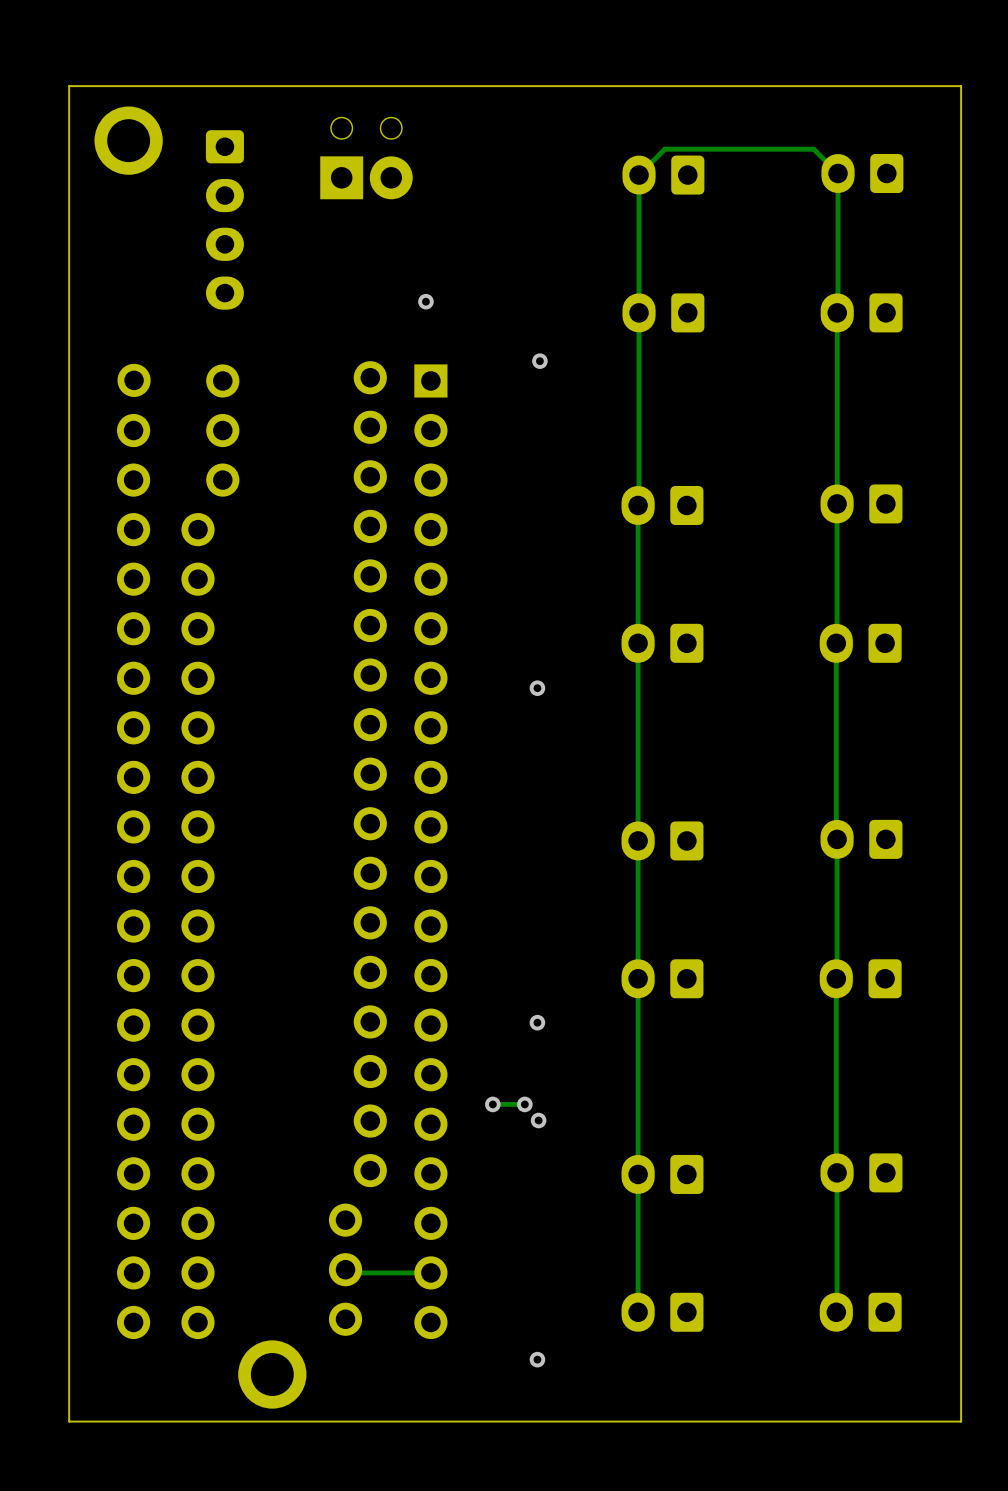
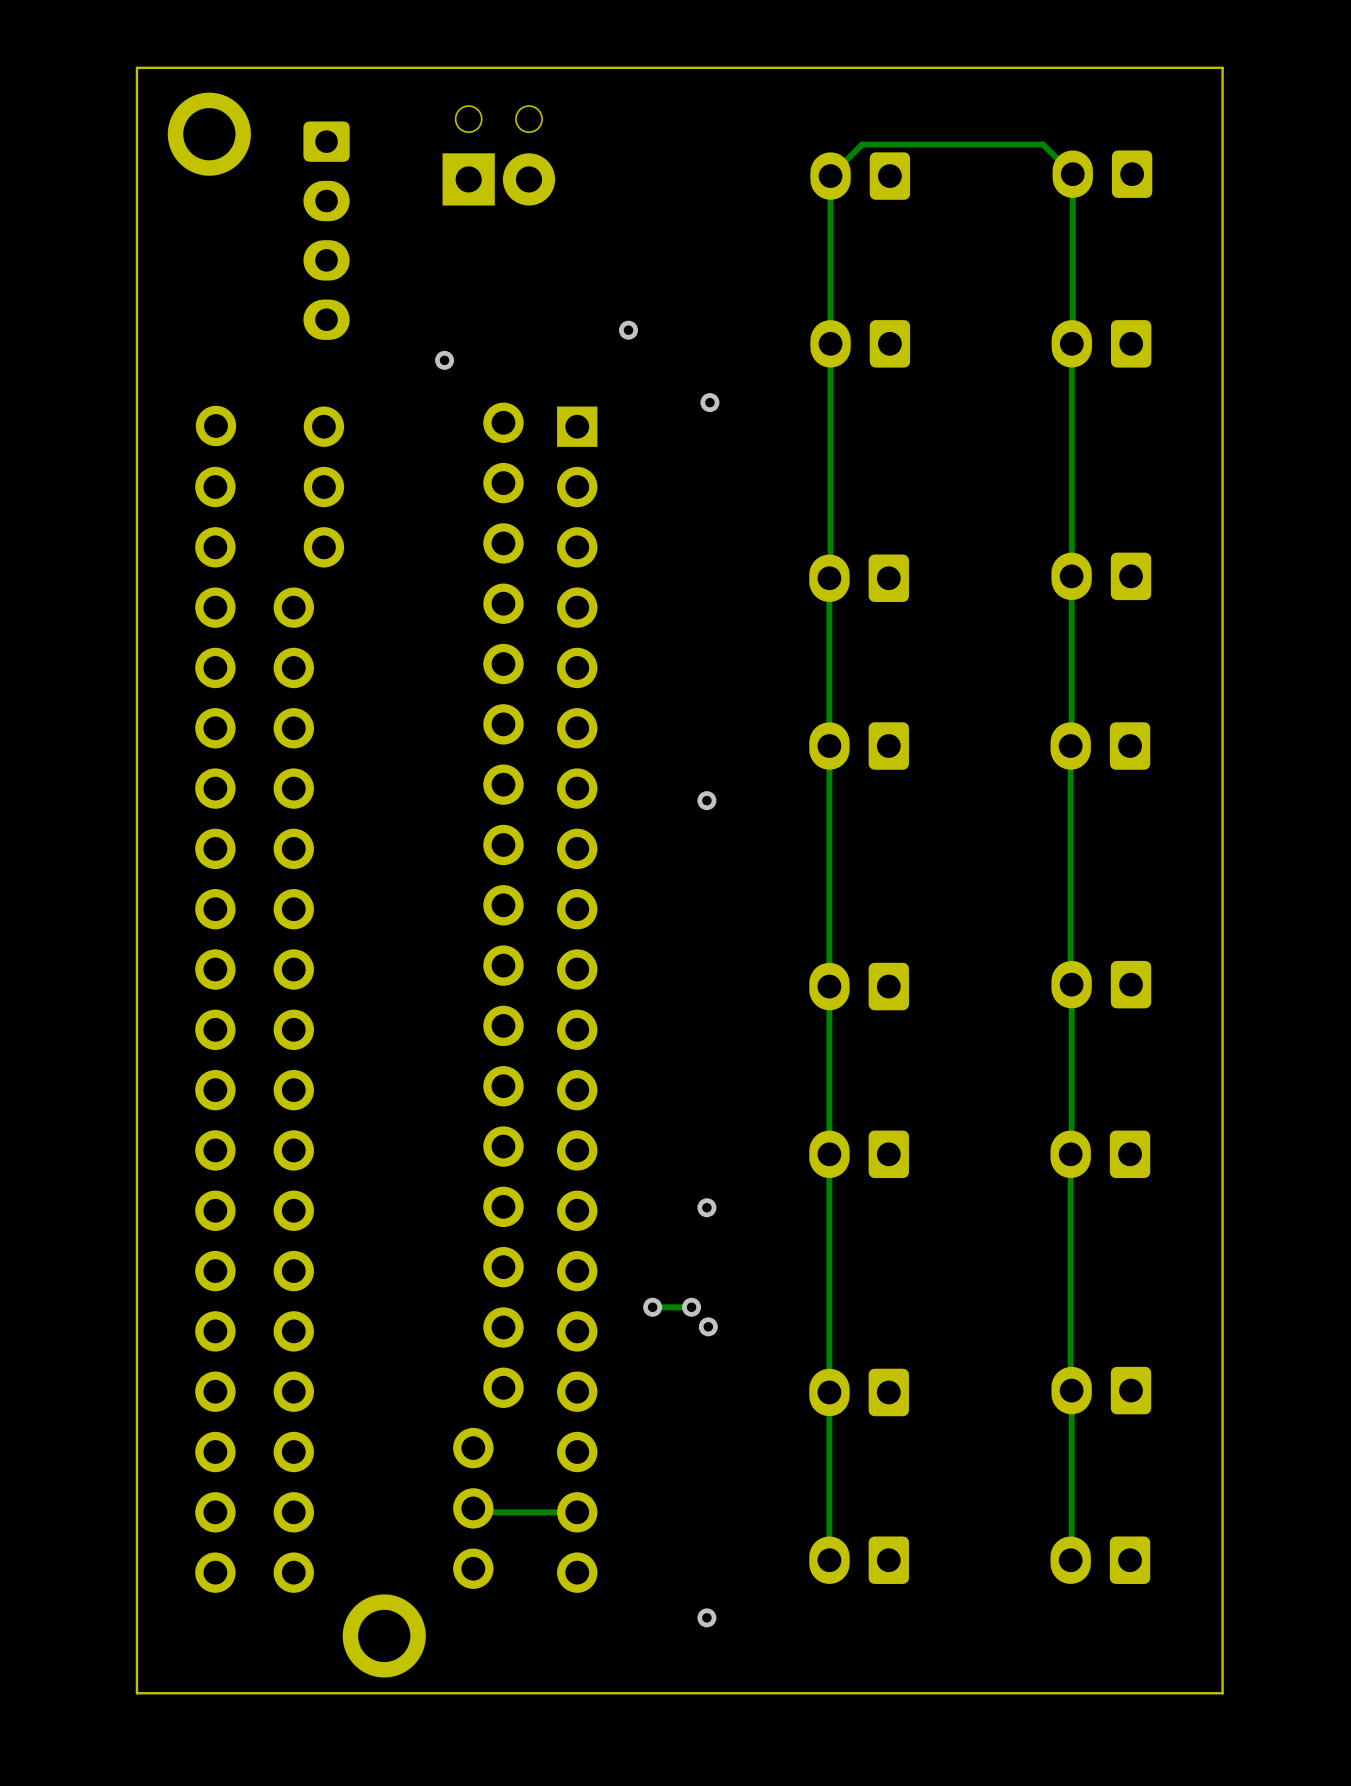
via position: (425, 301) -> (628, 330)
via: none -> (444, 360)

